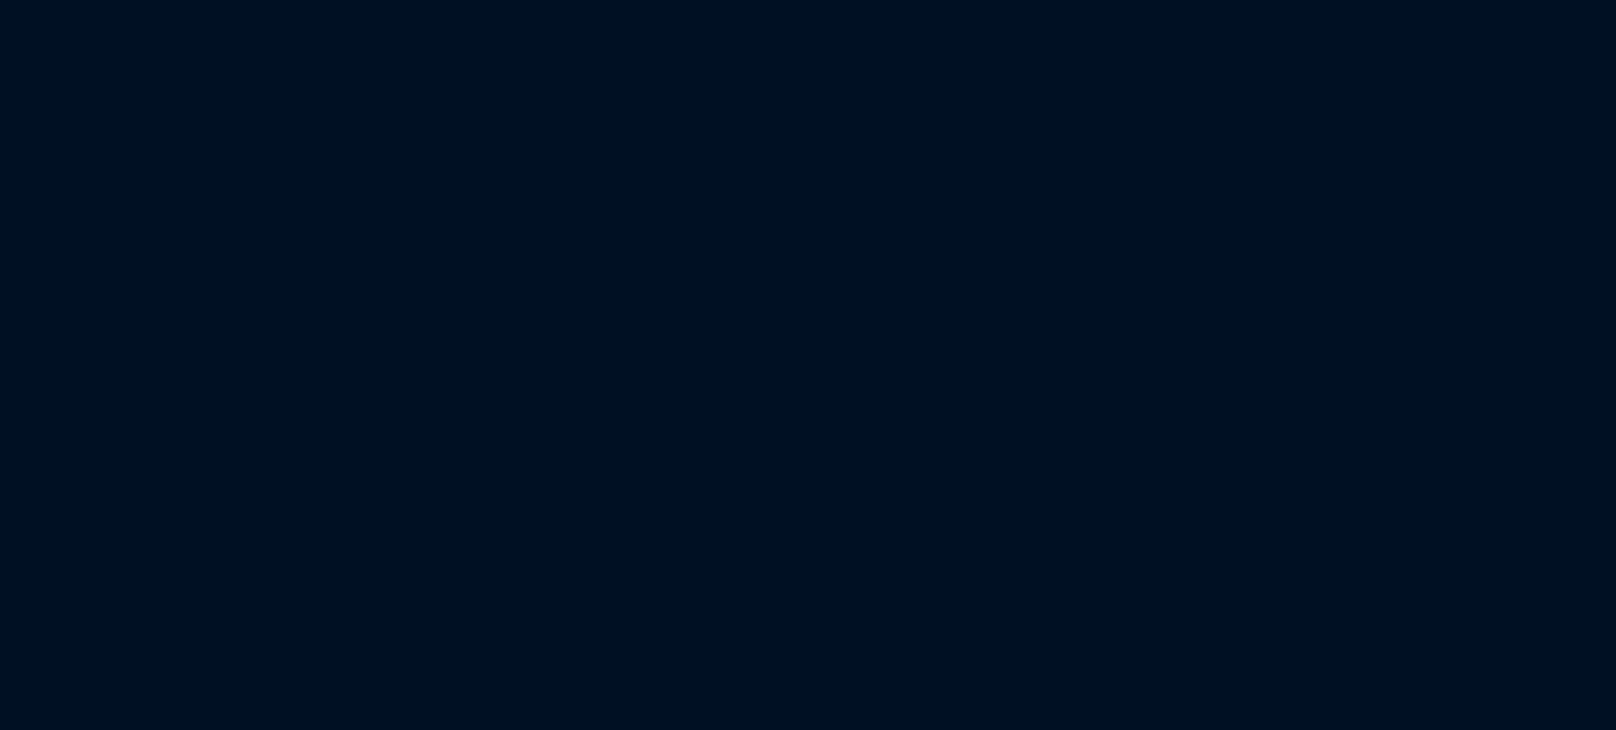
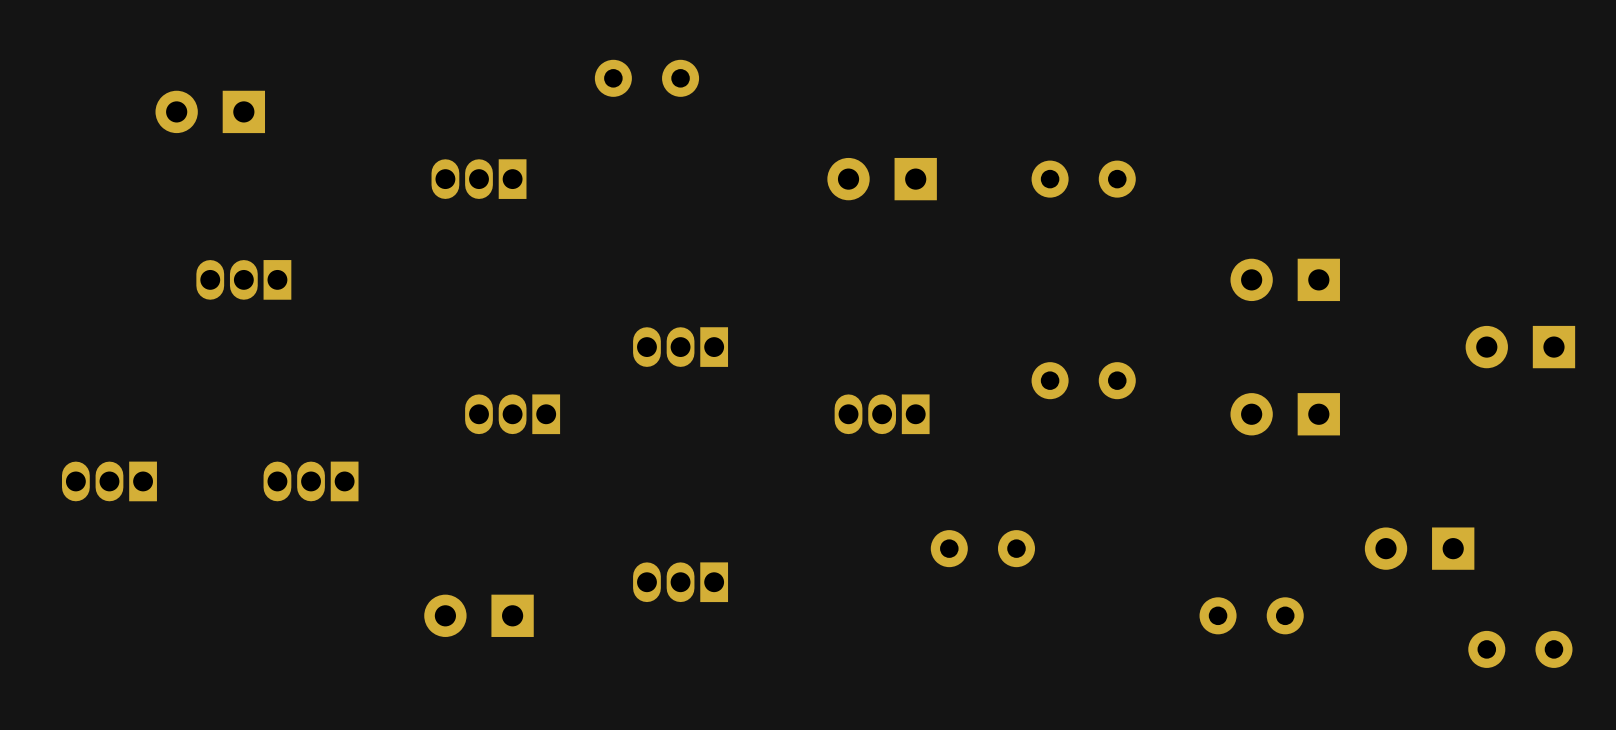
part: none -> (646, 78)
part: none -> (210, 111)
part: none -> (479, 179)
part: none -> (882, 179)
part: none -> (1083, 179)
part: none -> (243, 279)
part: none -> (1285, 279)
part: none -> (680, 347)
part: none -> (1520, 347)
part: none -> (1083, 380)
part: none -> (512, 414)
part: none -> (882, 414)
part: none -> (1285, 414)
part: none -> (109, 481)
part: none -> (311, 481)
part: none -> (982, 548)
part: none -> (1419, 548)
part: none -> (680, 582)
part: none -> (479, 615)
part: none -> (1251, 615)
part: none -> (1520, 649)

